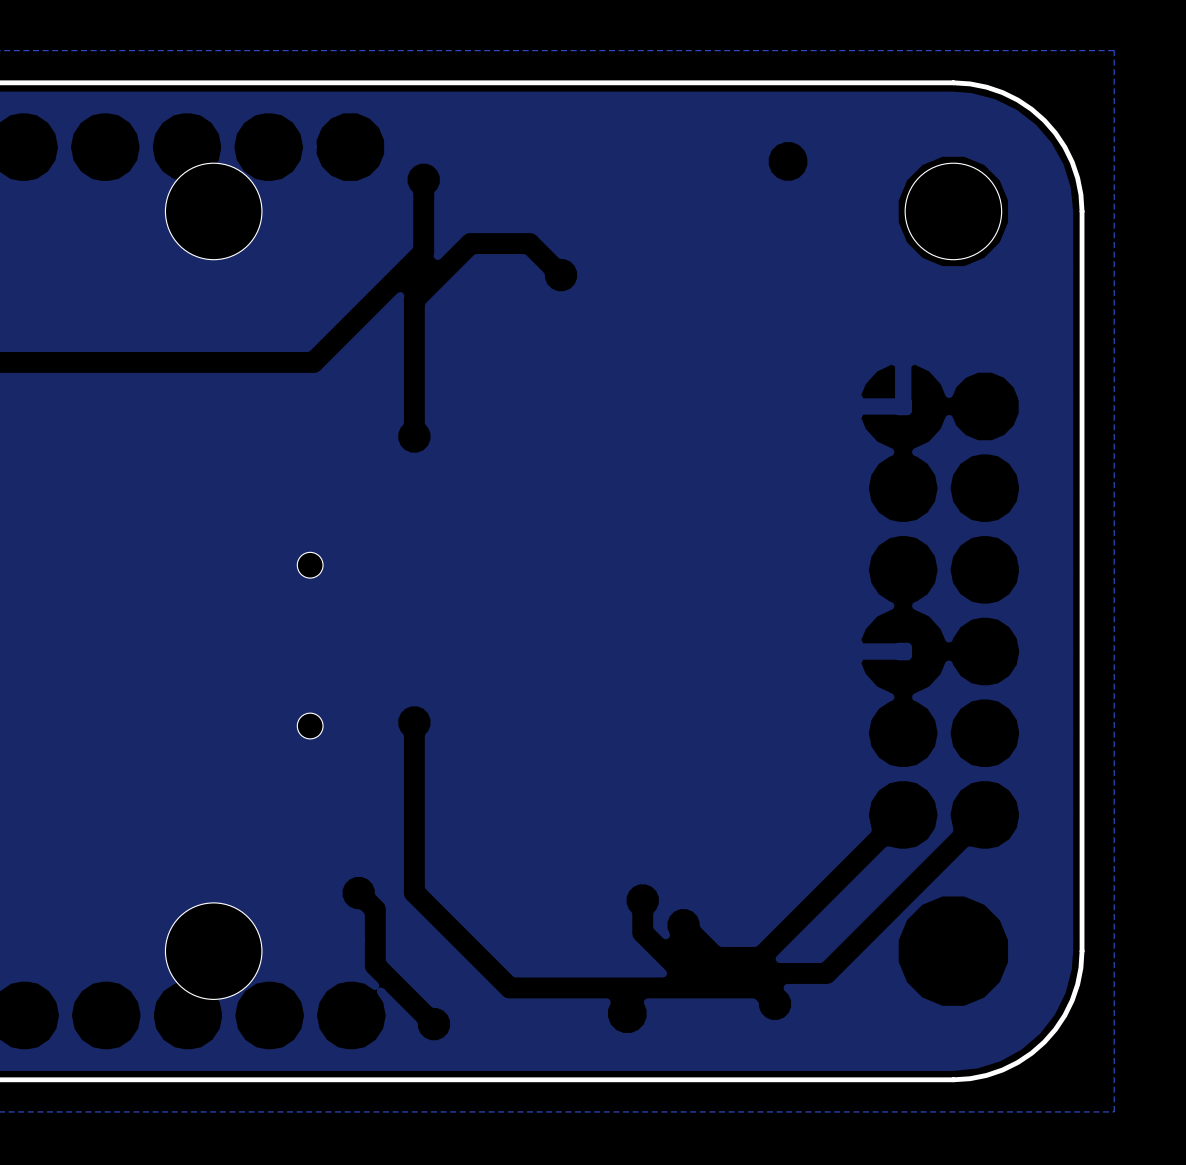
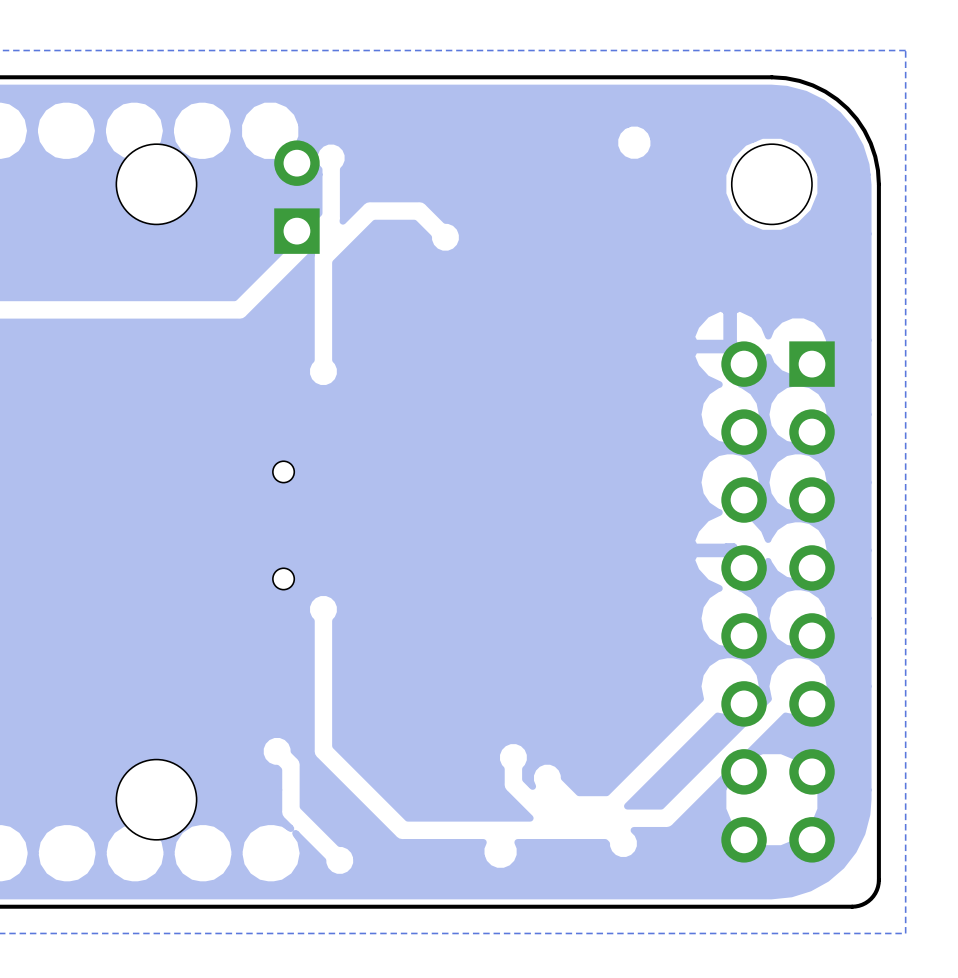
part: none -> (296, 197)
part position: (310, 565) -> (283, 471)
part: none -> (283, 578)
part: none -> (778, 601)
part: (310, 726) -> none
board edge: (1082, 951) (1077, 984) (1072, 1000) (1064, 1015) (1044, 1042) (1017, 1062) (1002, 1070) (986, 1075) (953, 1079) -> (878, 799) (878, 883) (871, 898) (855, 906) (771, 906)

